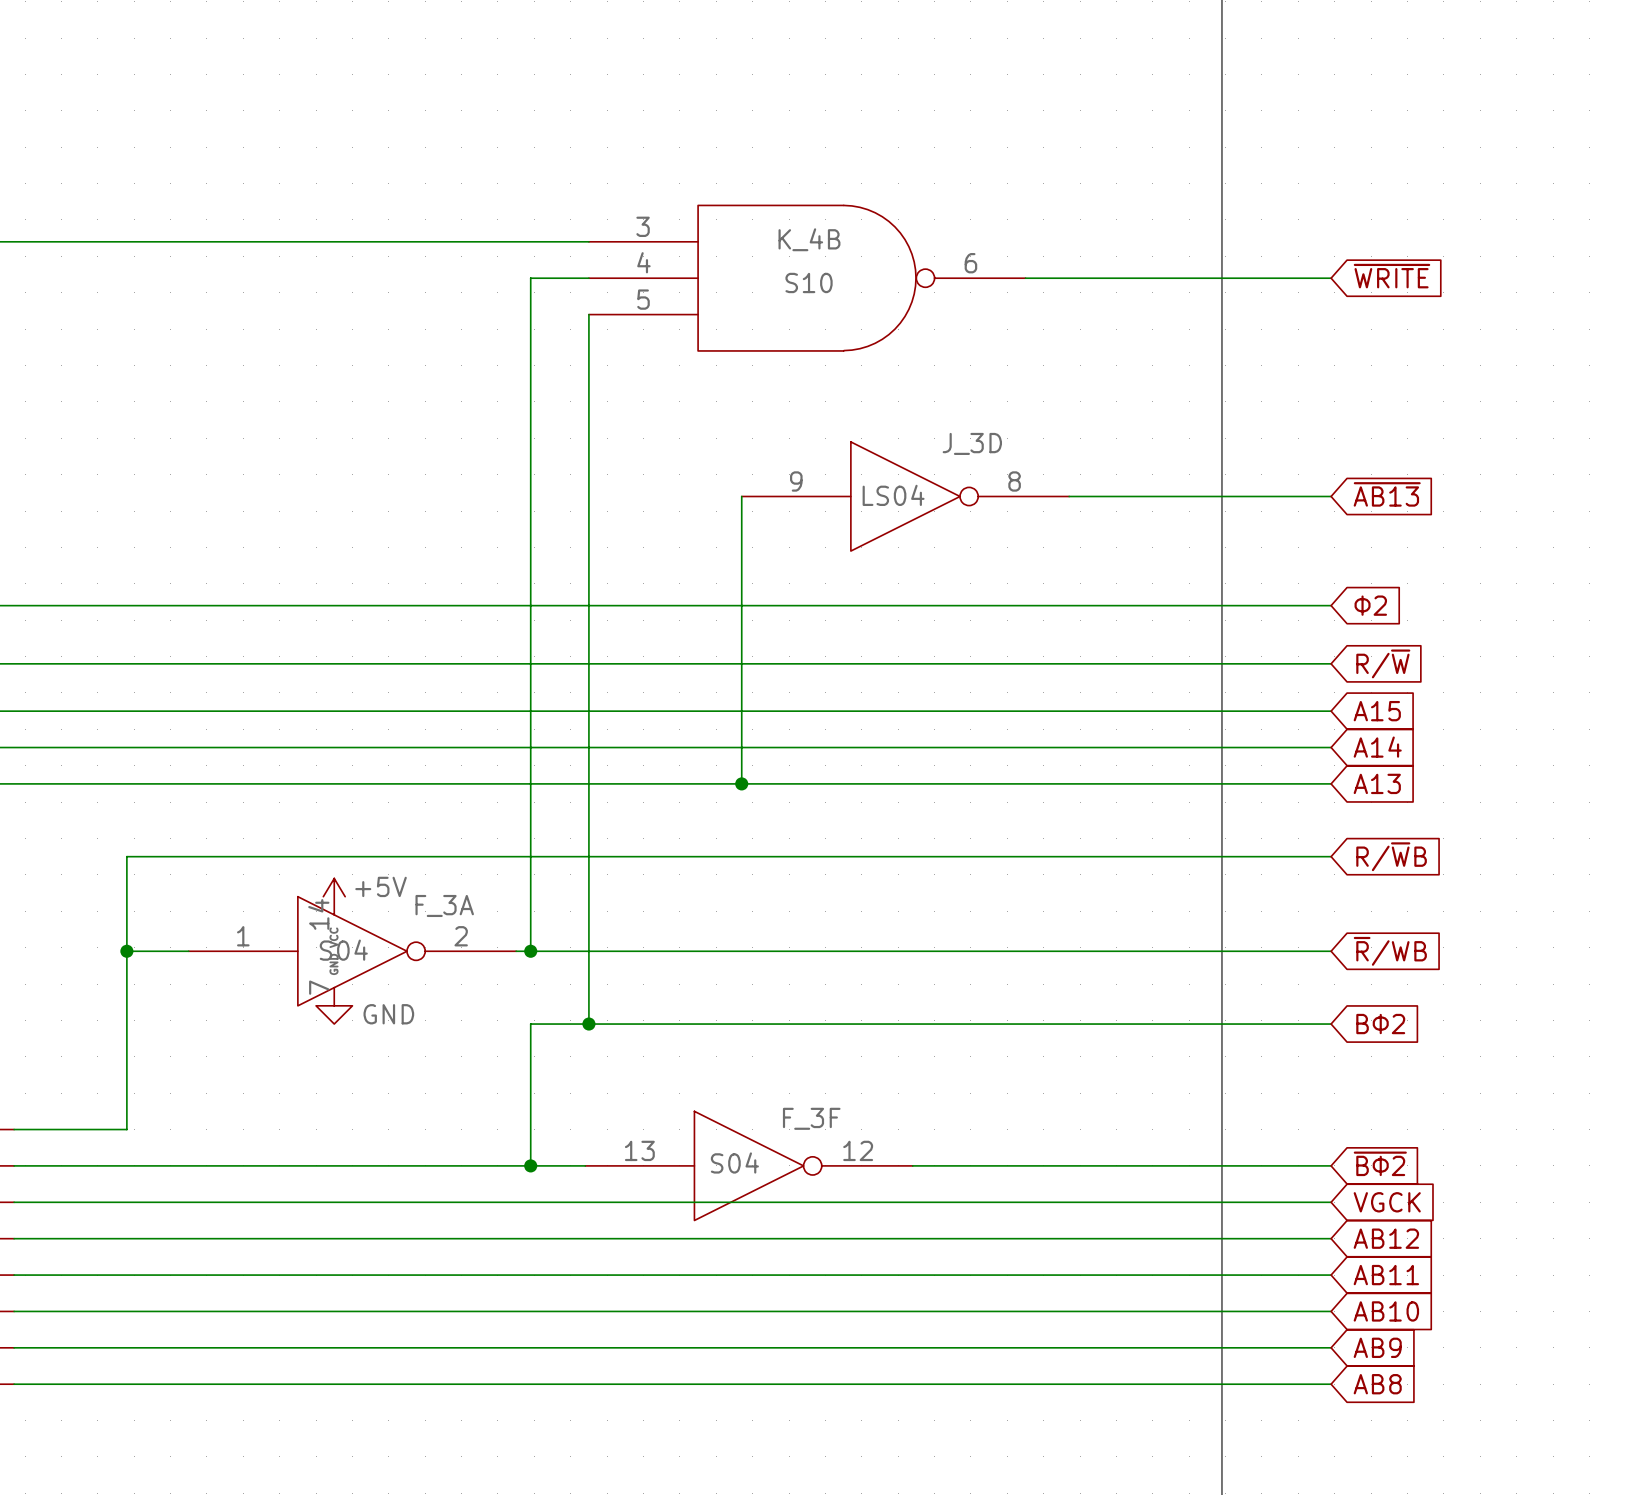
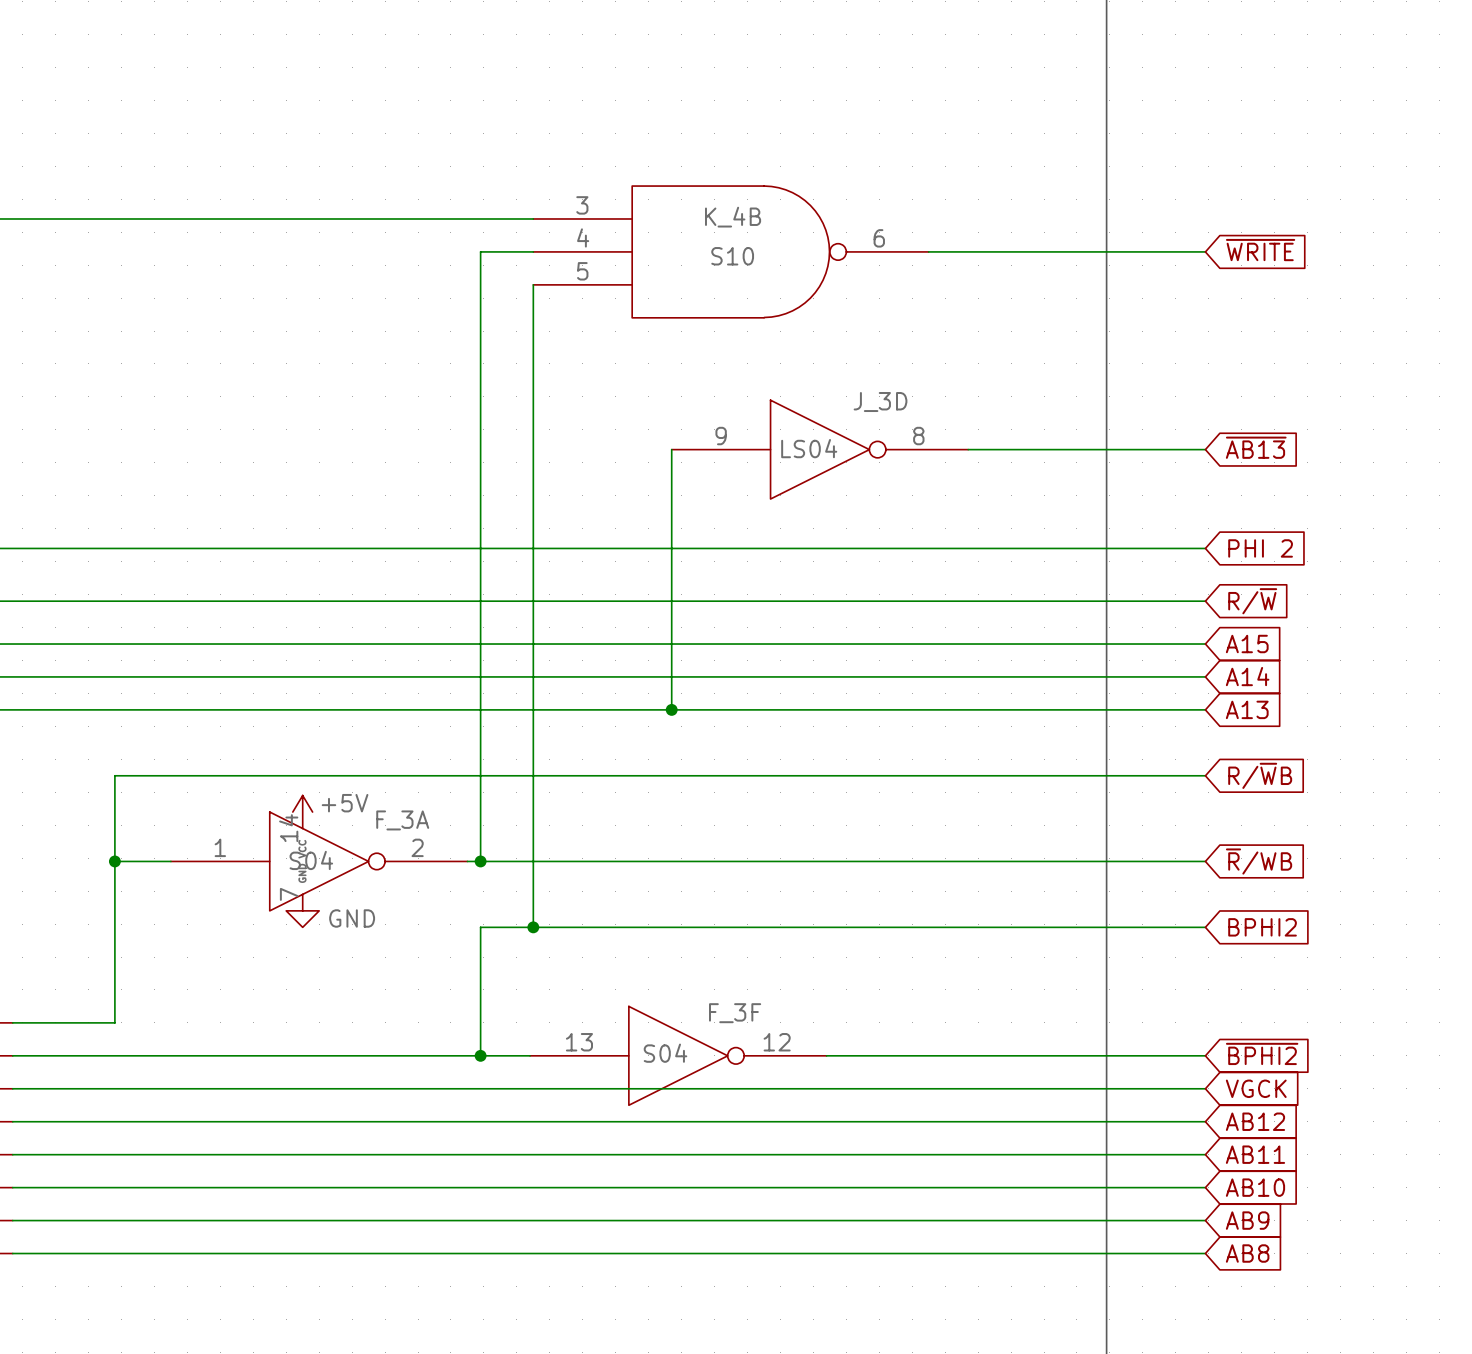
global label: Φ2 (1370, 605) -> PHI 2 (1260, 548)
global label: BΦ2 (1380, 1024) -> BPHI2 (1262, 927)
global label: ~{BΦ2} (1380, 1163) -> ~{BPHI2} (1262, 1053)

